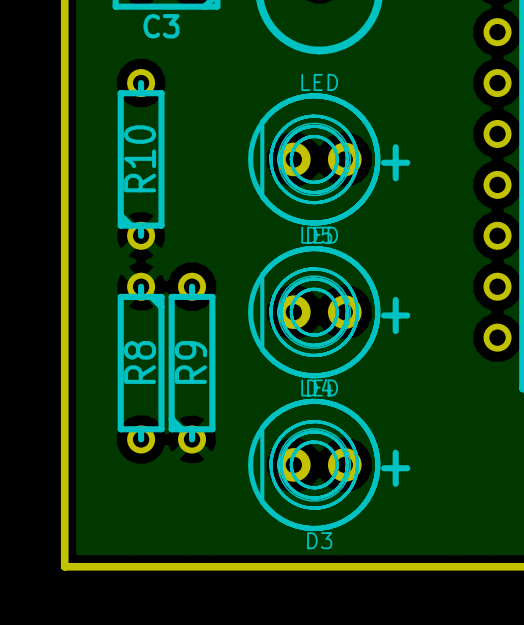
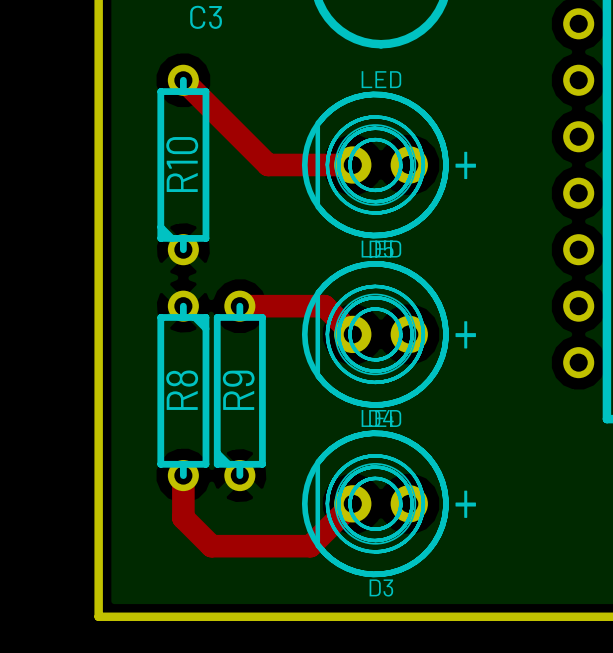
top track: none -> (183, 80) (268, 164) (352, 164)
top track: none -> (239, 306) (324, 306) (352, 334)
top track: none -> (183, 475) (183, 517) (211, 546) (310, 546) (352, 503)

